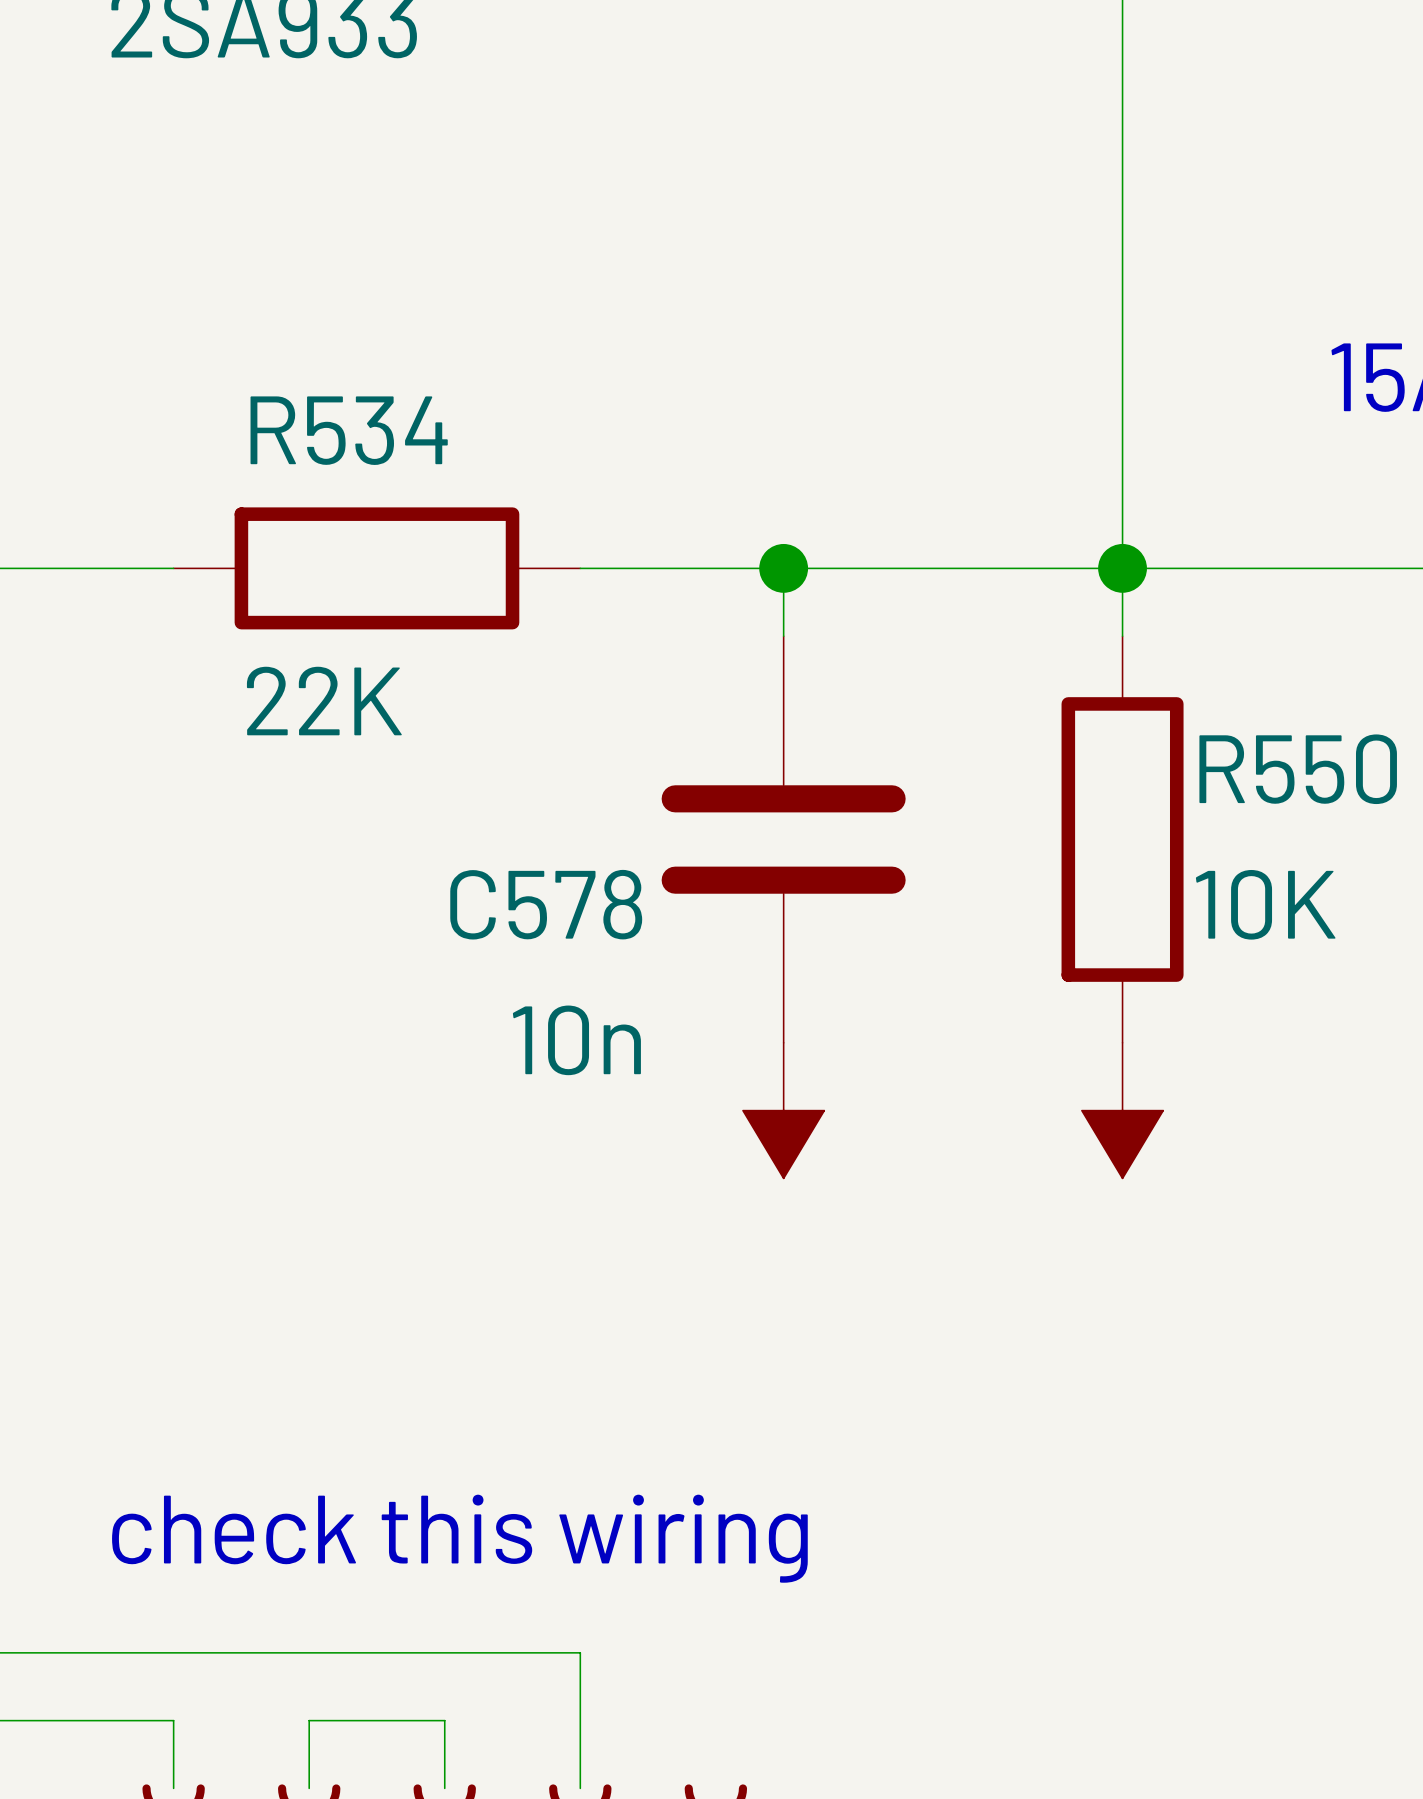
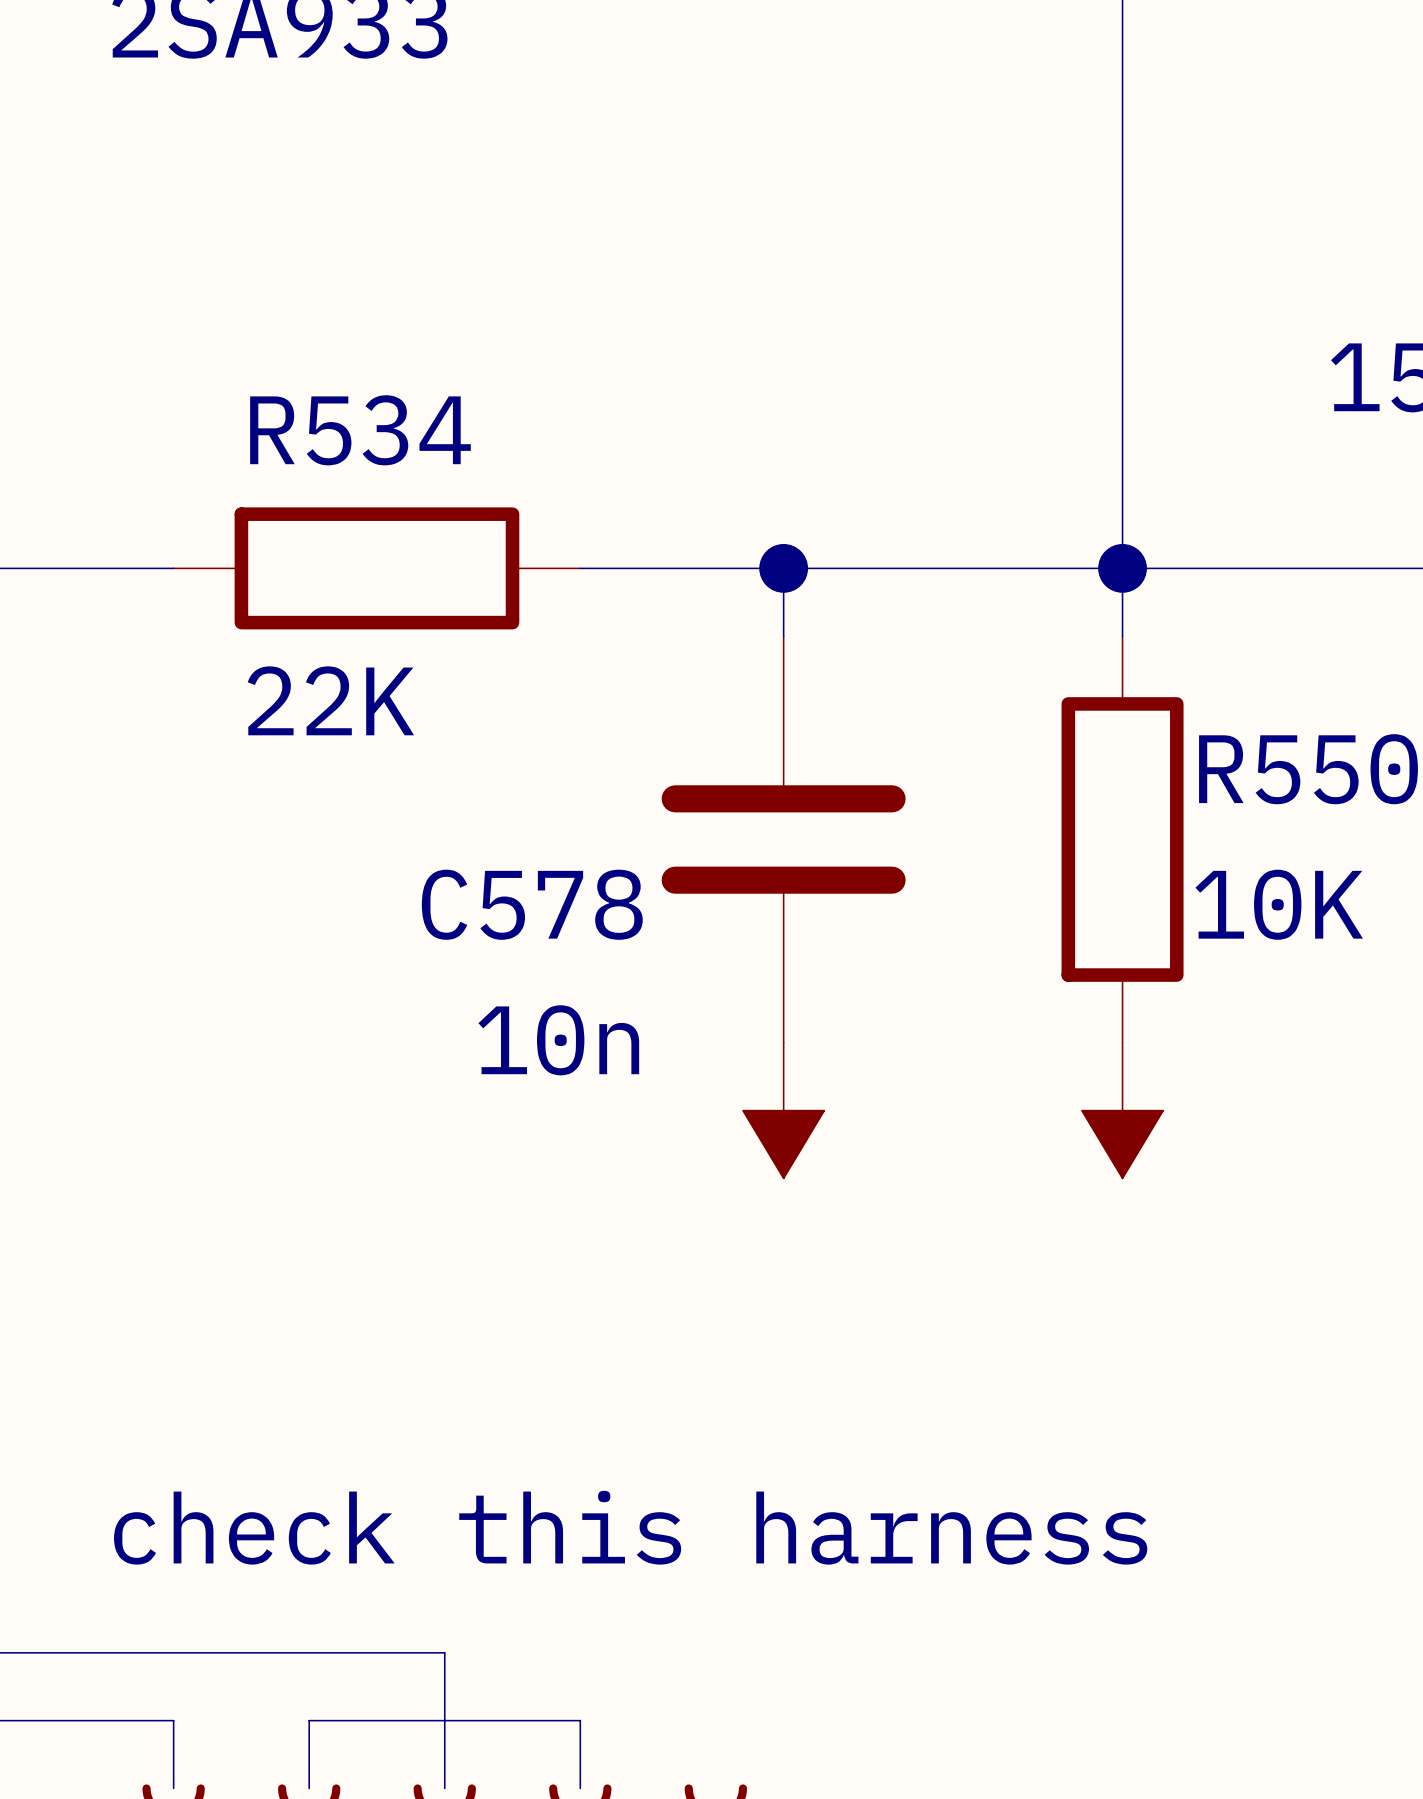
text: check this wiring (459, 1538) -> check this harness (630, 1527)
wire: (444, 1652) (580, 1652) (580, 1720) -> (444, 1652) (444, 1720) (580, 1720)

